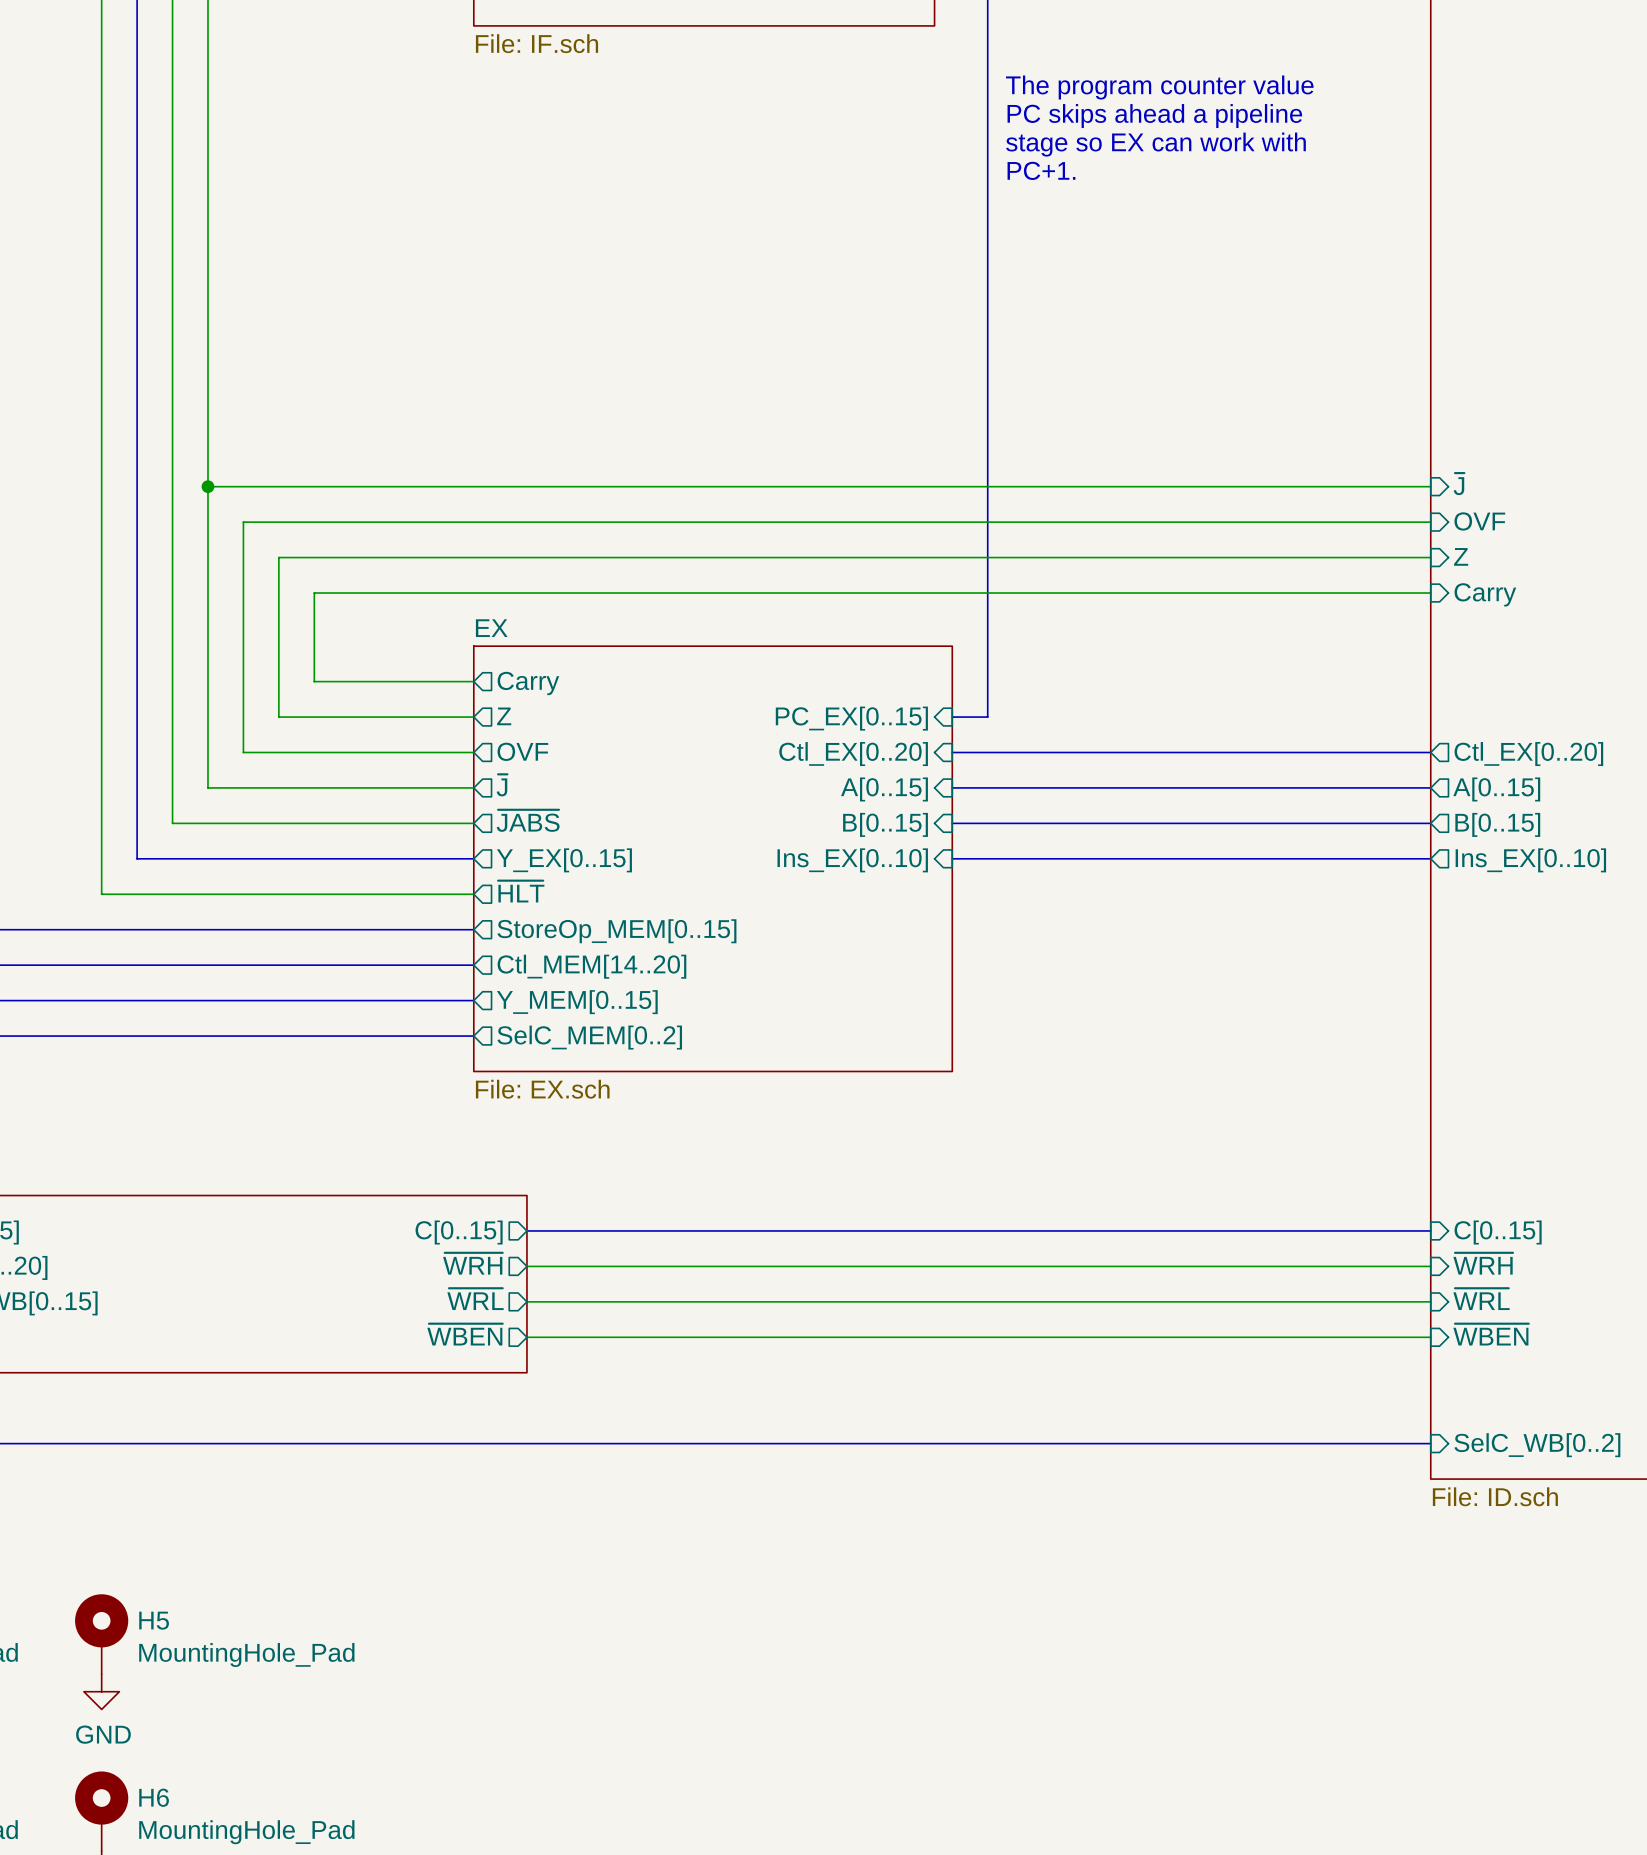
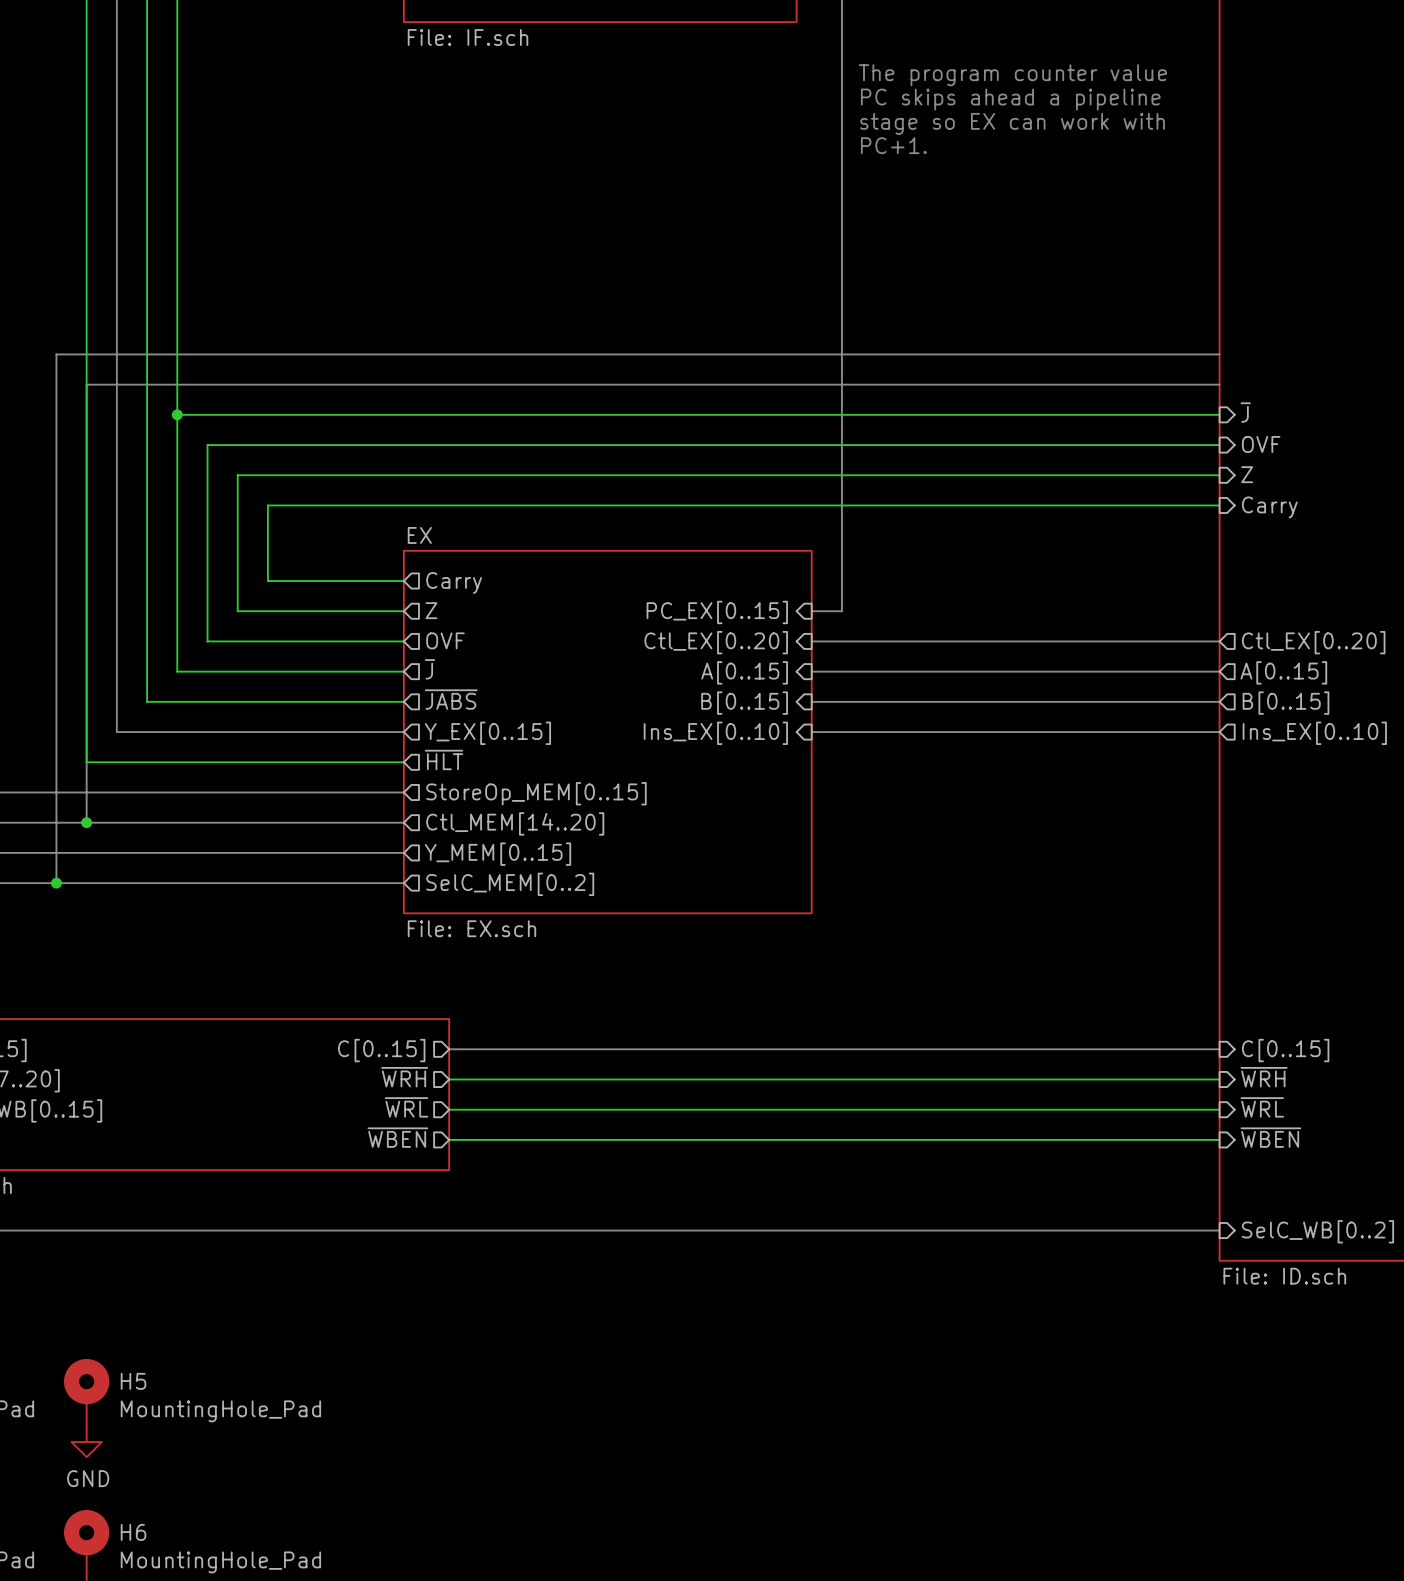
bus: none -> (1219, 354) (56, 354) (56, 883)
bus: none -> (1219, 384) (86, 384) (86, 822)
junction: none -> (86, 822)
junction: none -> (56, 883)

